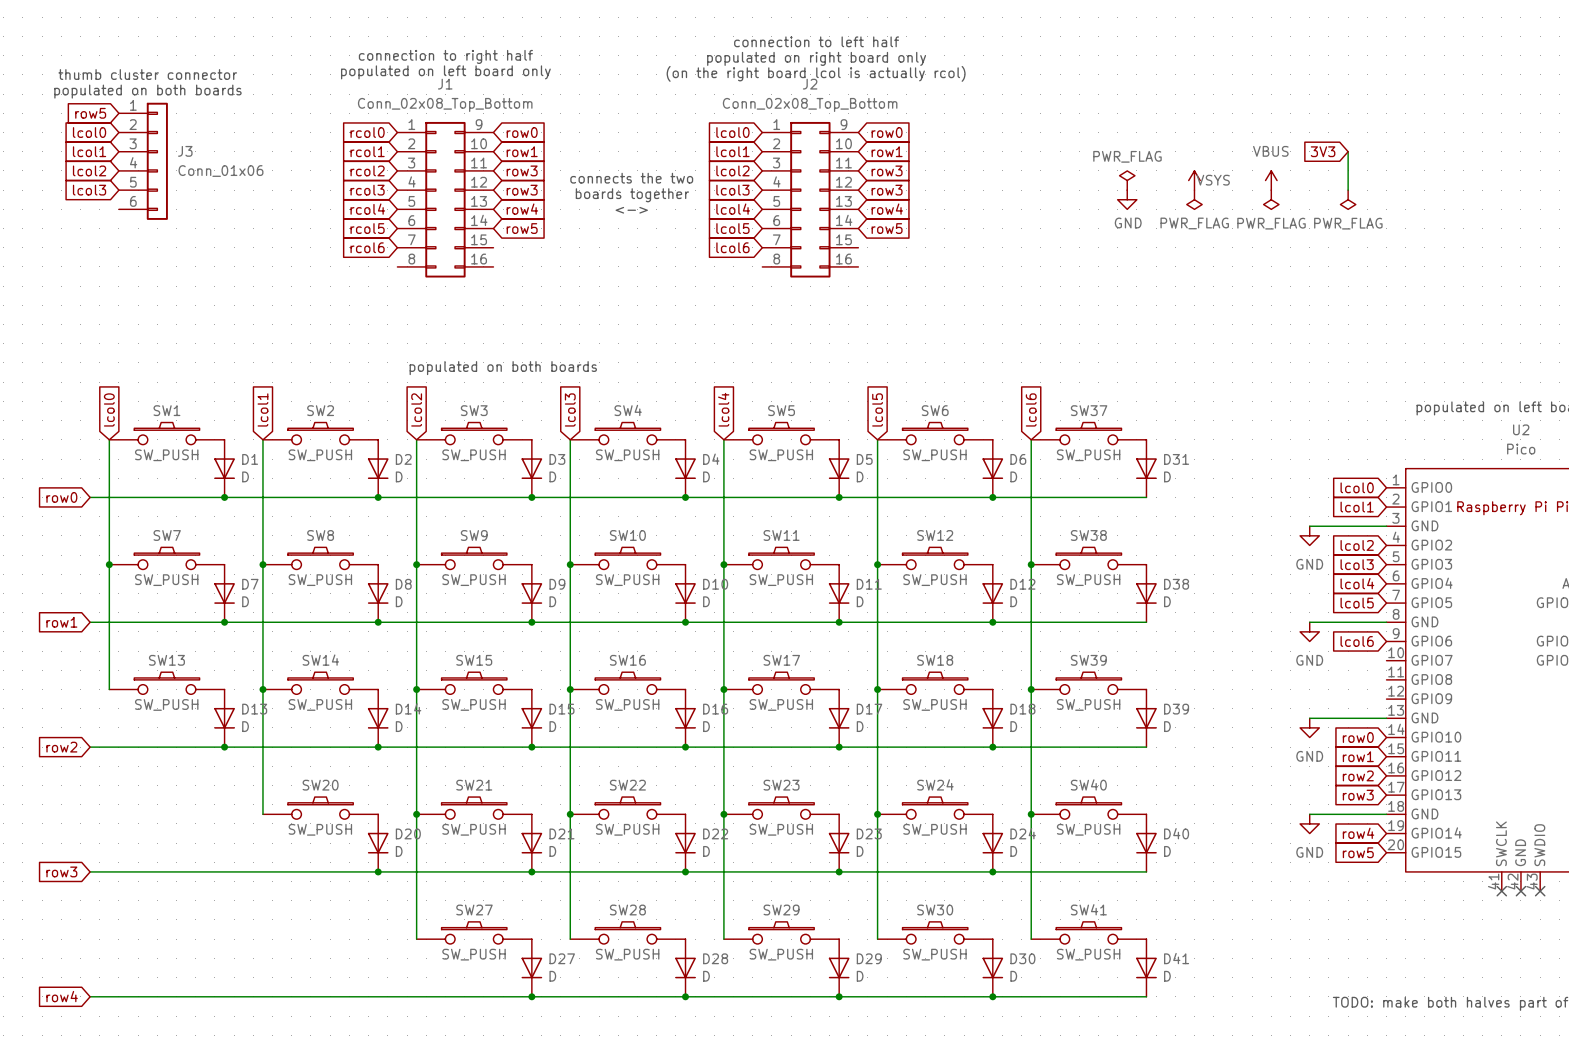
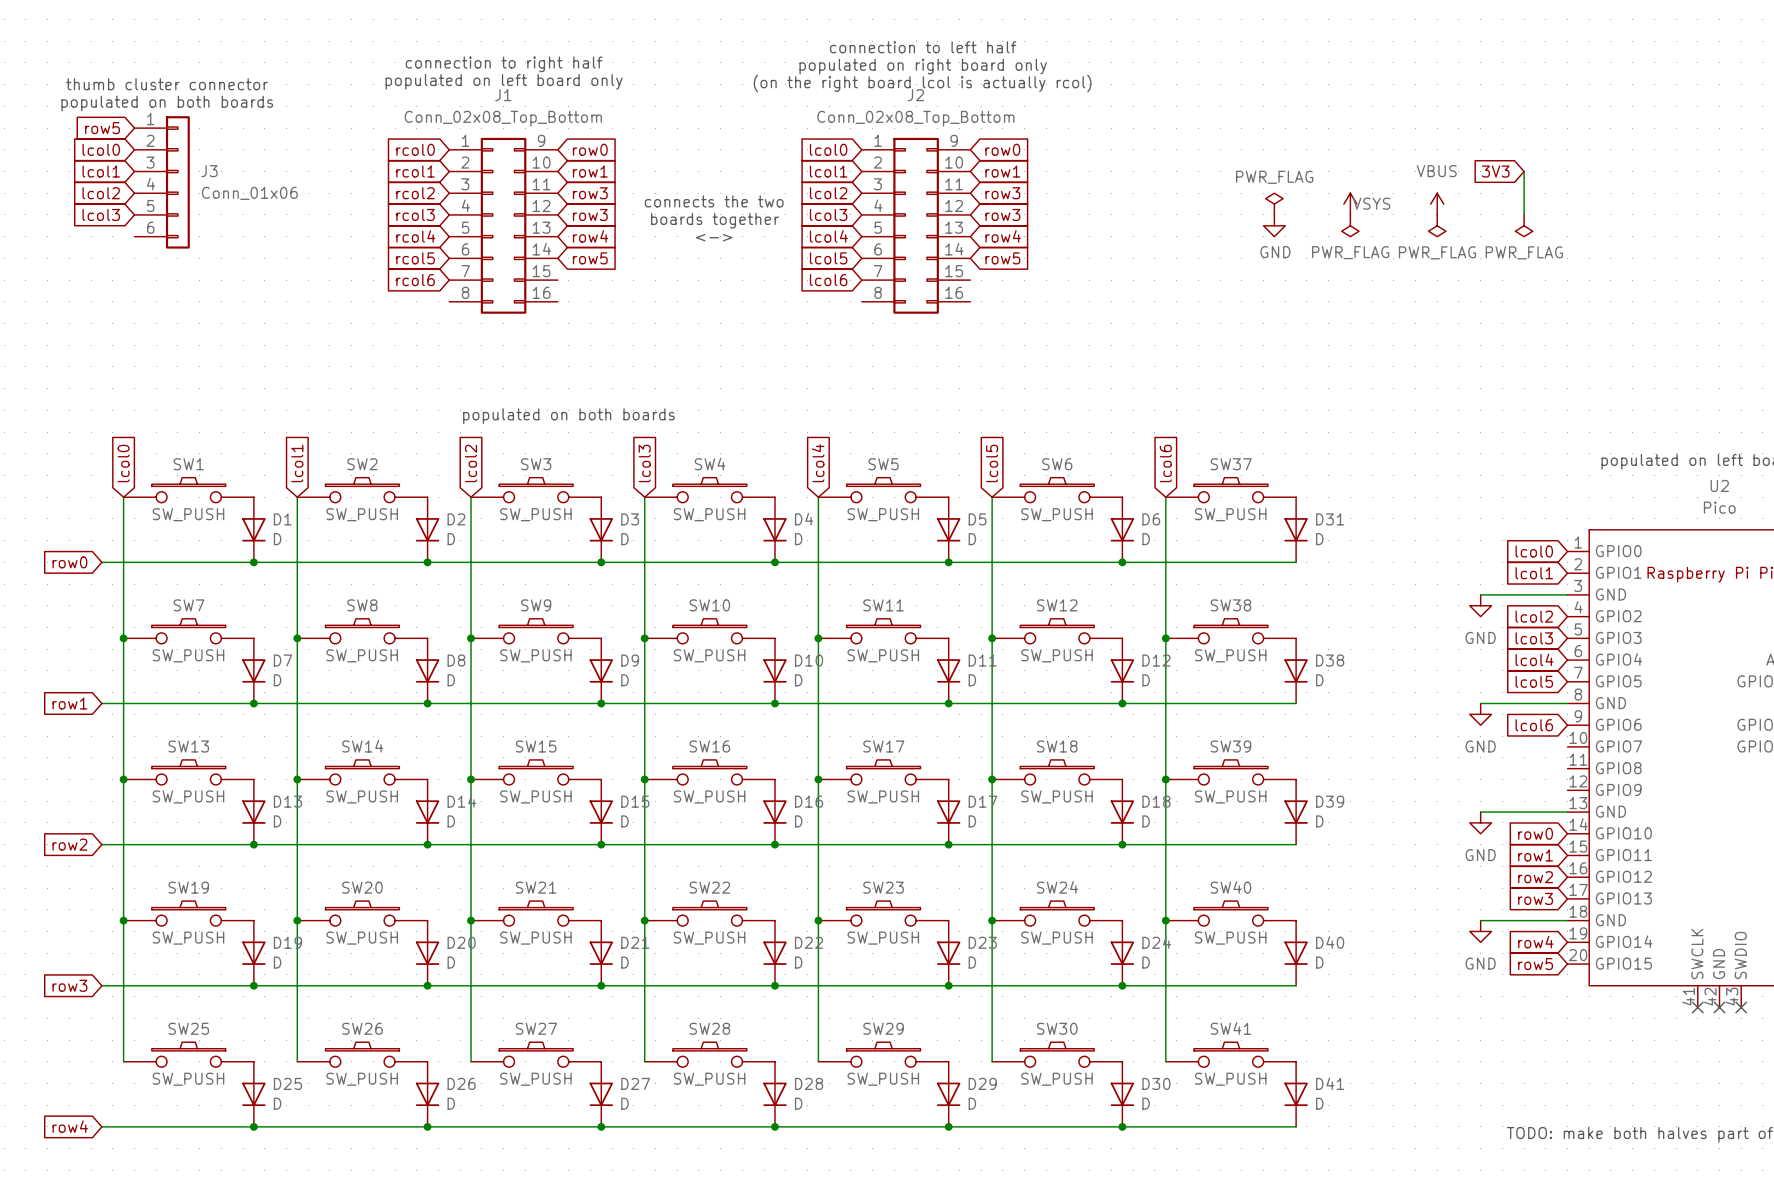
wire: none -> (123, 779) (123, 1061)
junction: none -> (123, 779)
SW19: none -> SW_PUSH (188, 913)
junction: none -> (123, 920)
wire: none -> (297, 920) (297, 1061)
junction: none -> (297, 920)
D19: none -> D (253, 953)
junction: none -> (253, 985)
SW25: none -> SW_PUSH (188, 1054)
SW26: none -> SW_PUSH (362, 1054)
D25: none -> D (253, 1094)
D26: none -> D (427, 1094)
junction: none -> (253, 1126)
junction: none -> (427, 1126)

